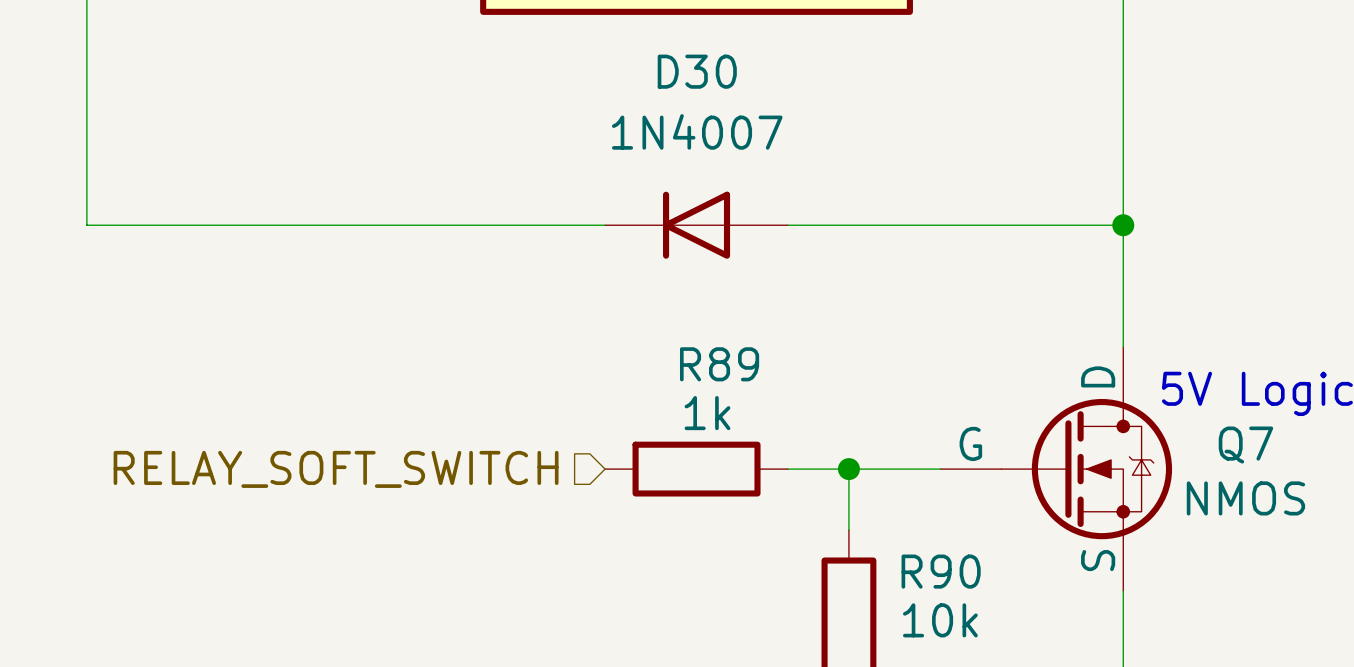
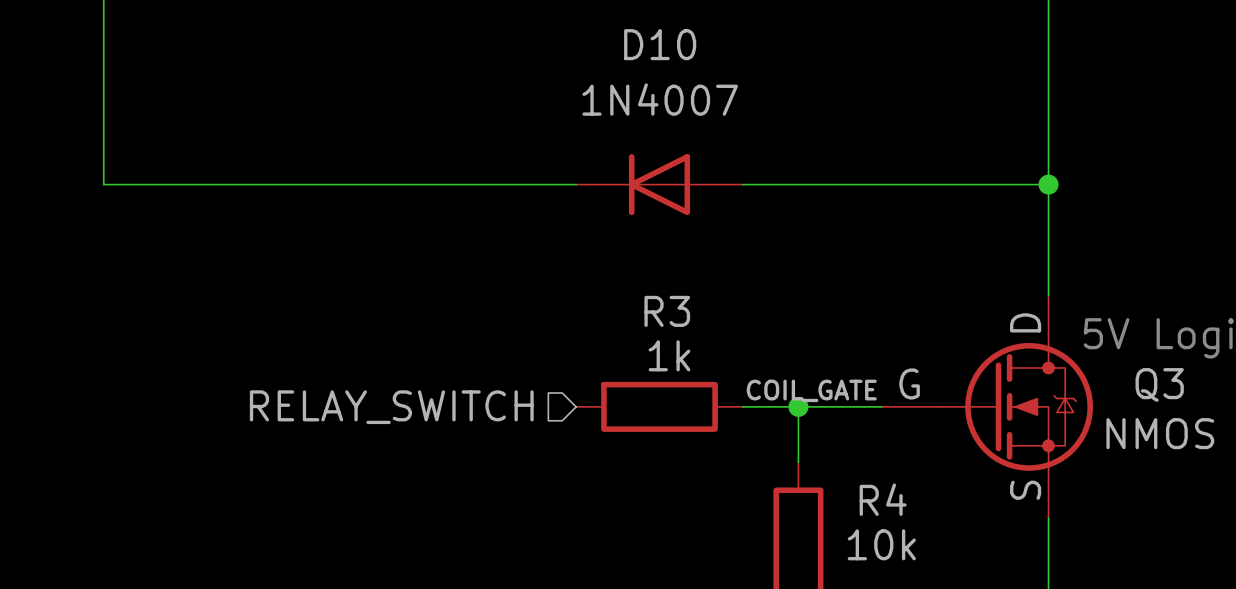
D30 name: D30 (697, 71) -> D10 (660, 44)
R89 name: R89 (719, 364) -> R3 (667, 311)
Q7 name: Q7 (1245, 445) -> Q3 (1159, 384)
label: none -> COIL_GATE (811, 390)
hierarchical label: RELAY_SOFT_SWITCH (336, 469) -> RELAY_SWITCH (391, 407)
R90 name: R90 (941, 571) -> R4 (883, 499)

